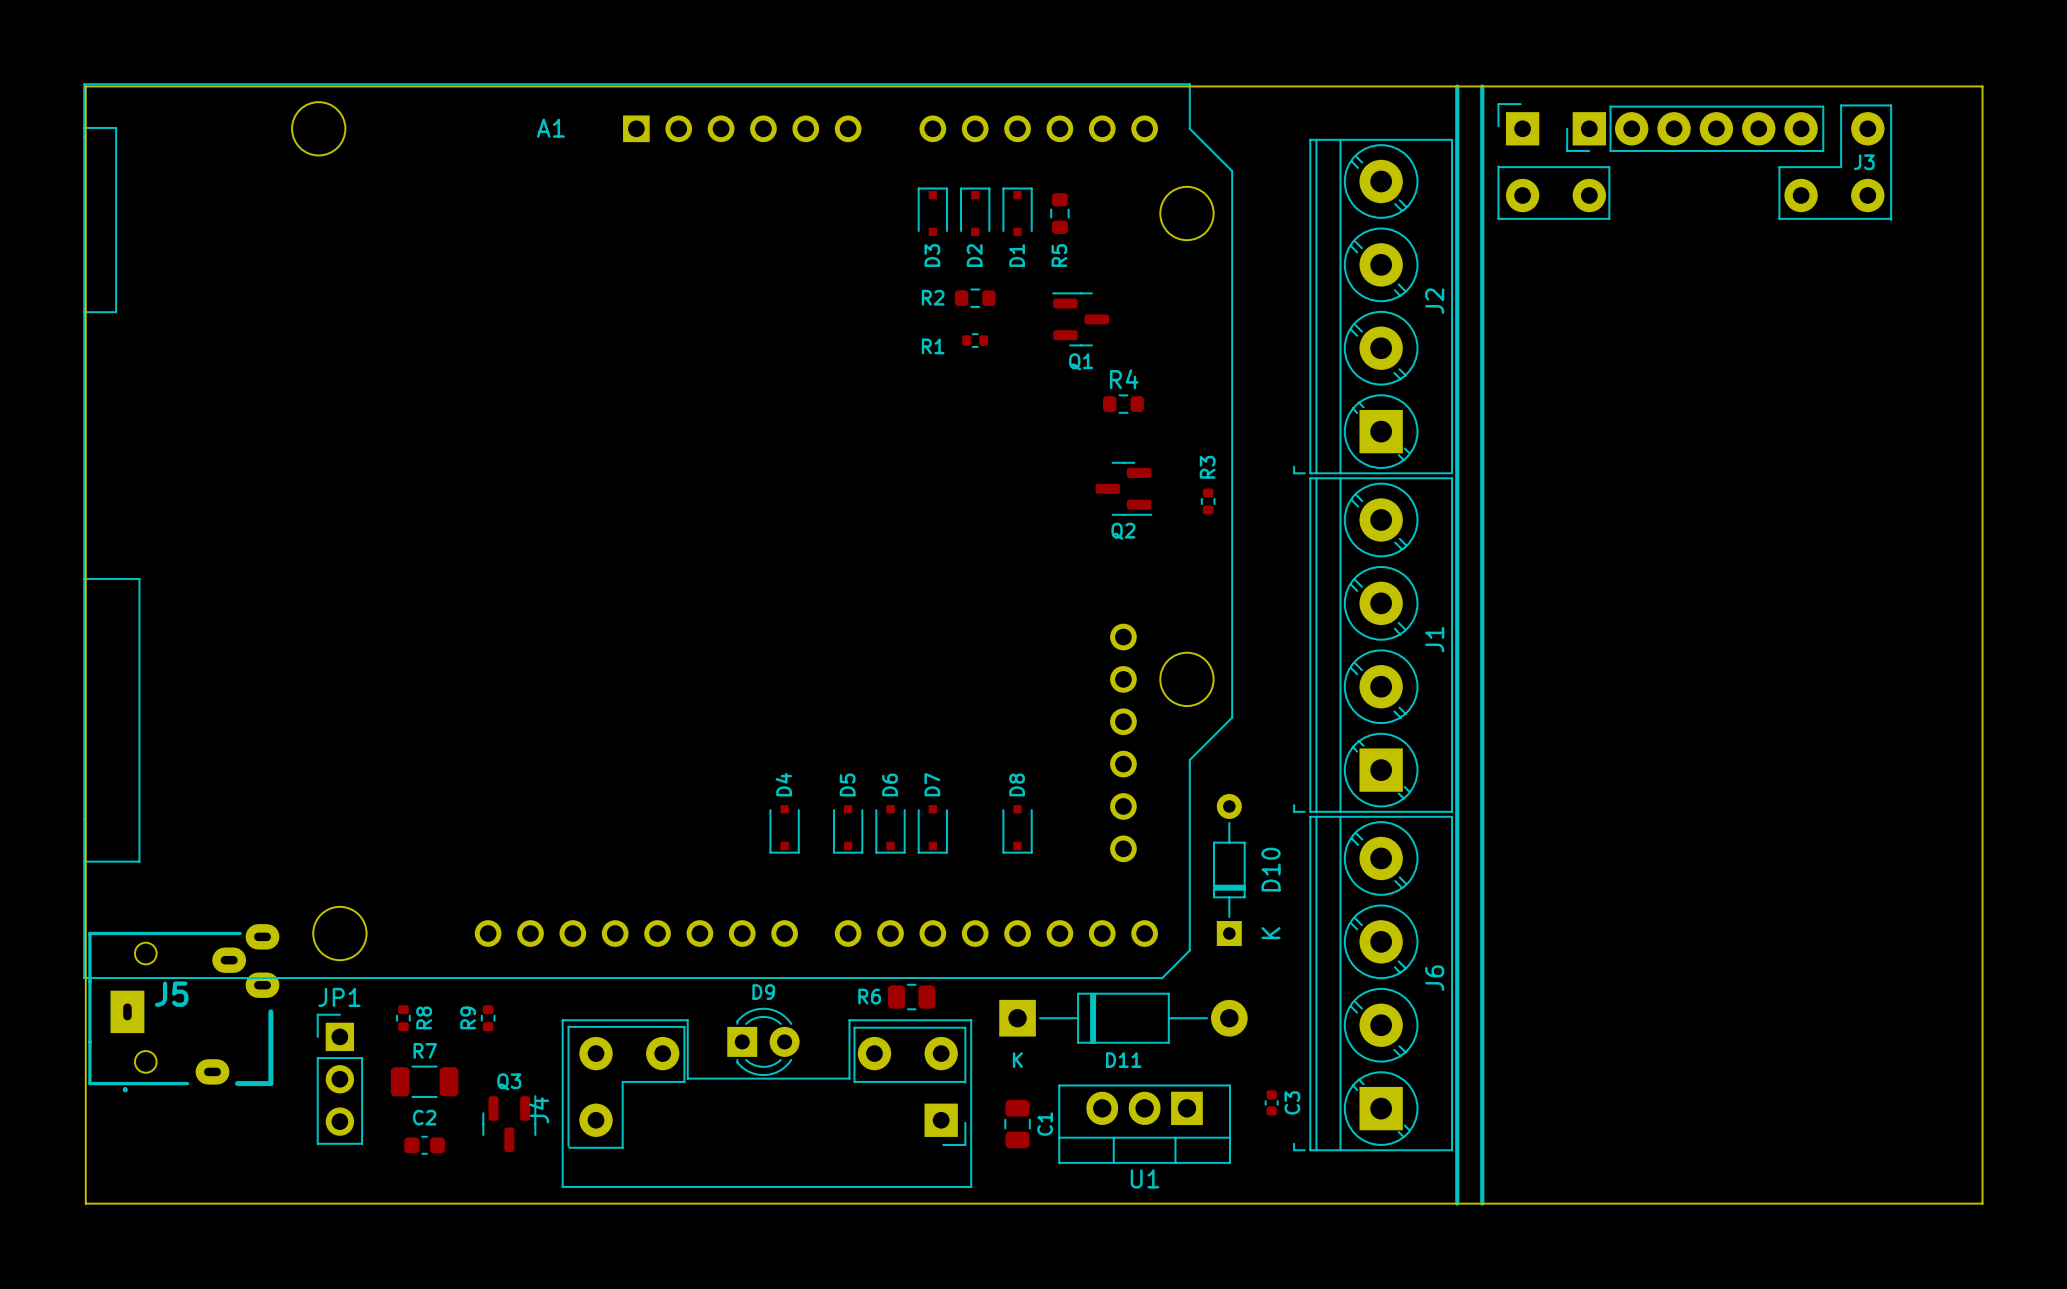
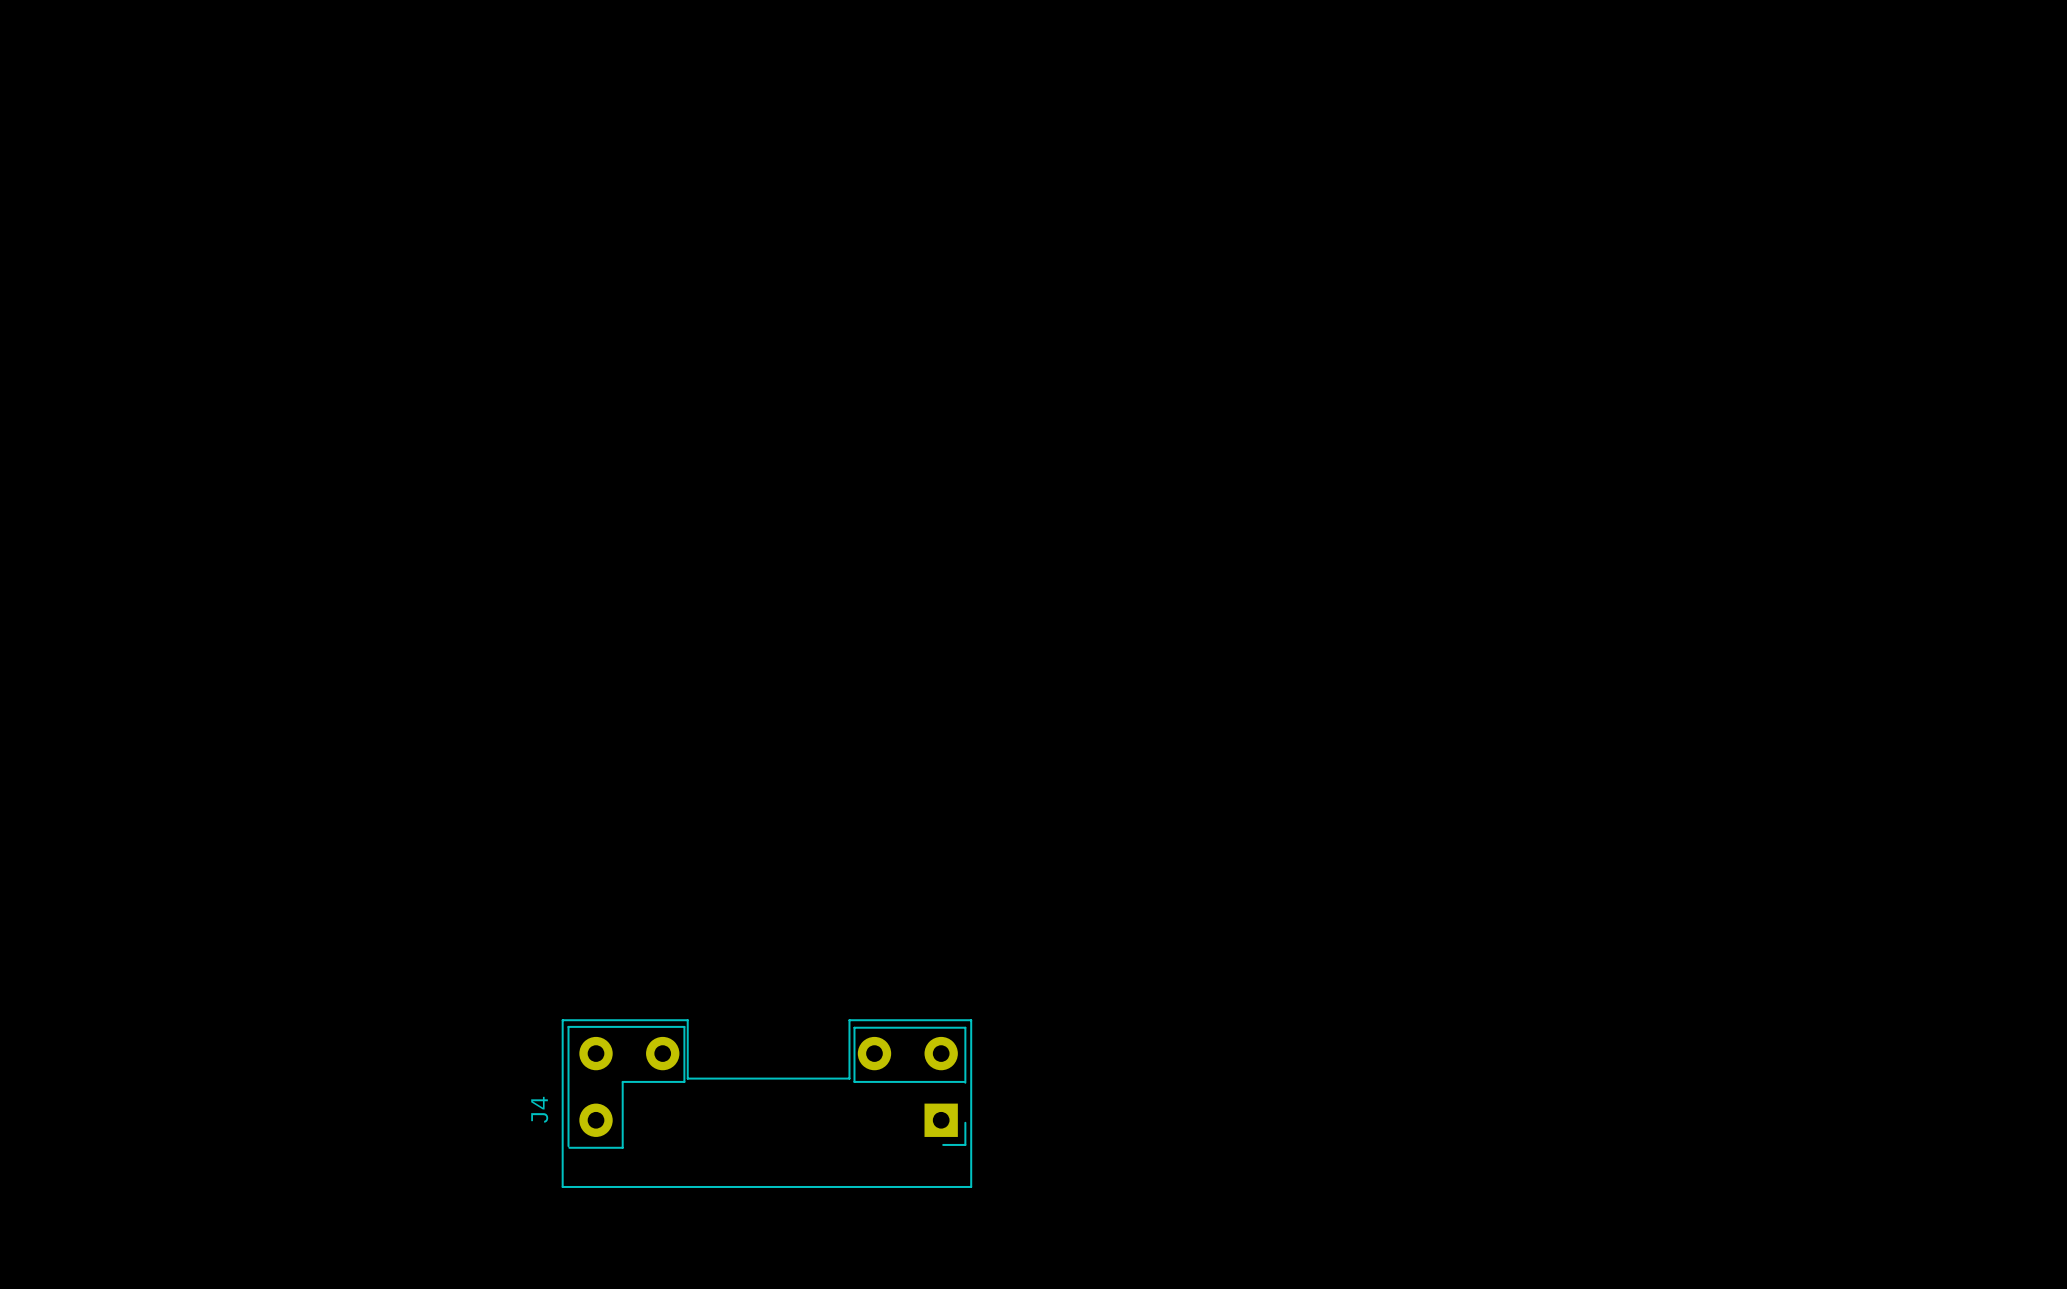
board edge: (85, 86) (1982, 86) (1982, 1203) (85, 1203) (85, 86) -> none
line: (1457, 86) (1457, 1203) -> none
line: (1482, 86) (1482, 1203) -> none
J3: (1694, 162) -> none
D3: (932, 211) -> none
D2: (975, 211) -> none
D1: (1017, 211) -> none
R5: (1059, 213) -> none
R2: (975, 298) -> none
J2: (1373, 306) -> none
Q1: (1080, 319) -> none
R1: (975, 340) -> none
R4: (1123, 404) -> none
Q2: (1123, 488) -> none
R3: (1208, 501) -> none
A1: (658, 531) -> none
J1: (1373, 645) -> none
D4: (784, 829) -> none
D5: (848, 829) -> none
D6: (890, 829) -> none
D7: (932, 829) -> none
D8: (1017, 829) -> none
D10: (1229, 869) -> none
J6: (1373, 983) -> none
R6: (911, 997) -> none
J5: (183, 1008) -> none
R8: (403, 1018) -> none
R9: (488, 1018) -> none
D11: (1123, 1018) -> none
D9: (763, 1041) -> none
JP1: (339, 1079) -> none
R7: (424, 1081) -> none
C3: (1271, 1102) -> none
Q3: (509, 1123) -> none
C1: (1017, 1124) -> none
U1: (1144, 1124) -> none
C2: (424, 1145) -> none

